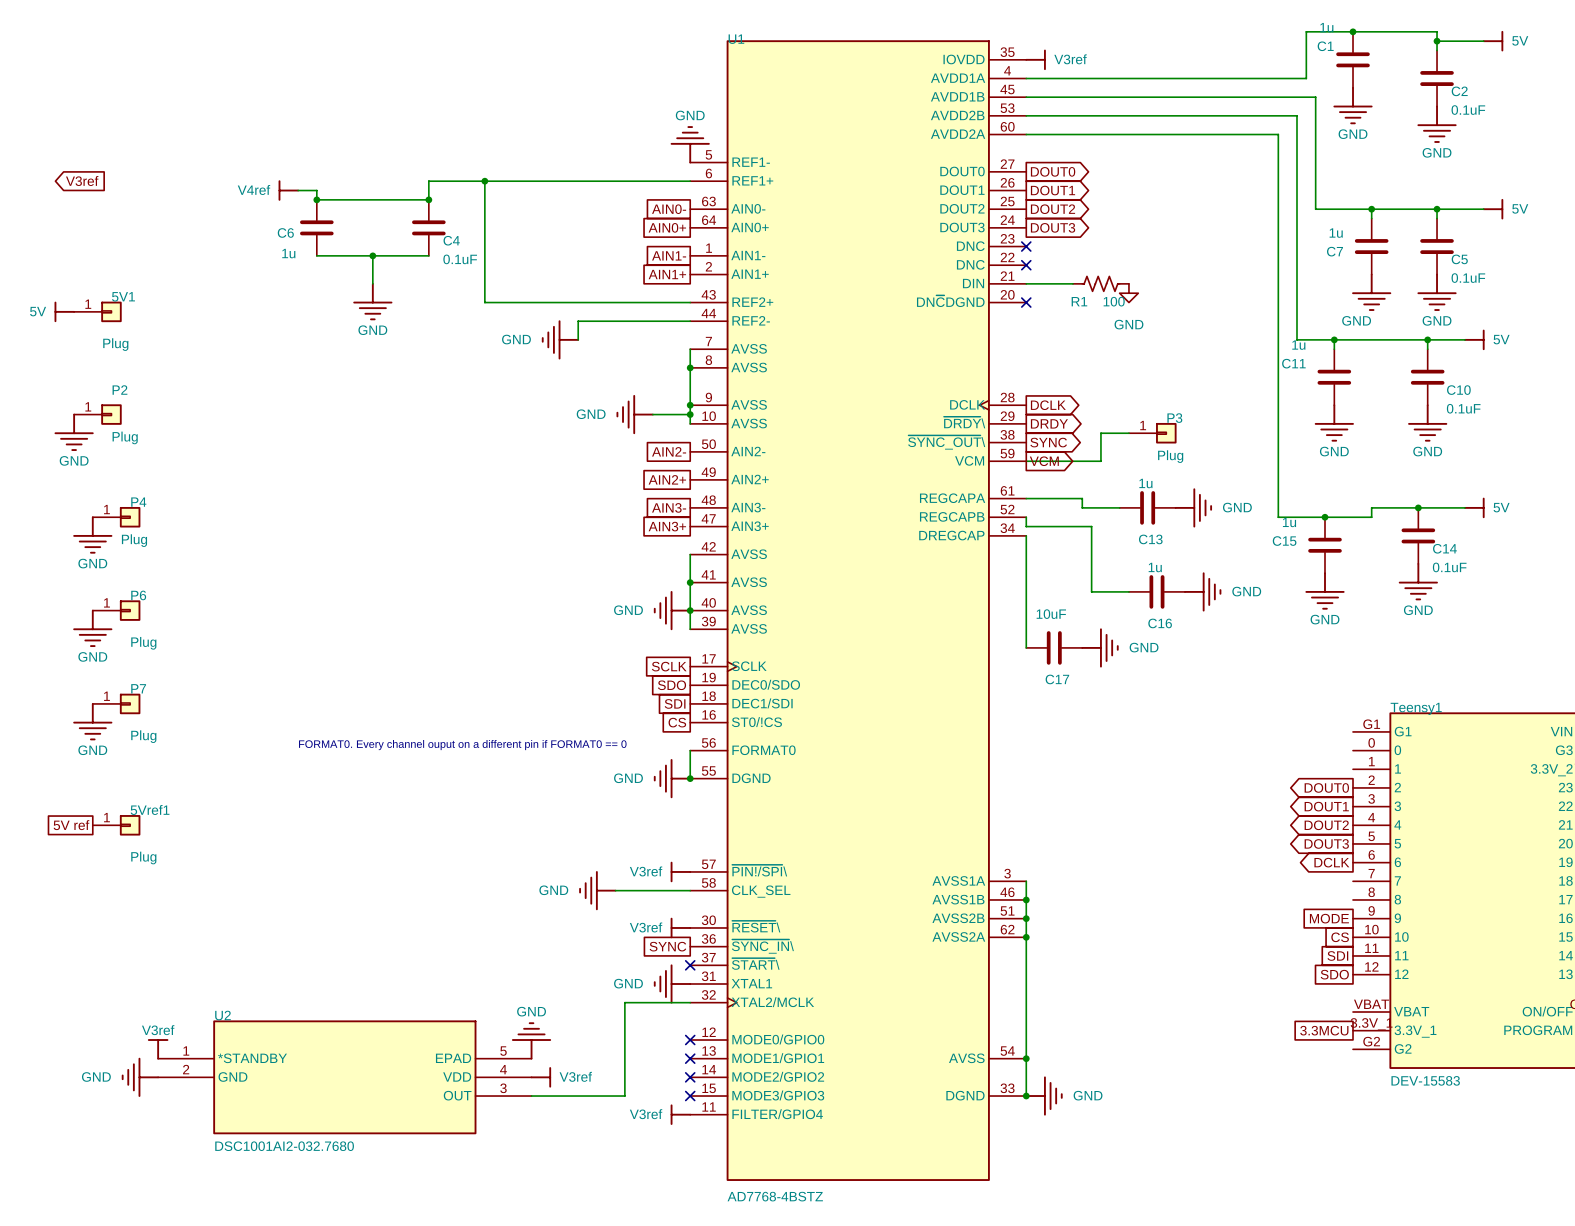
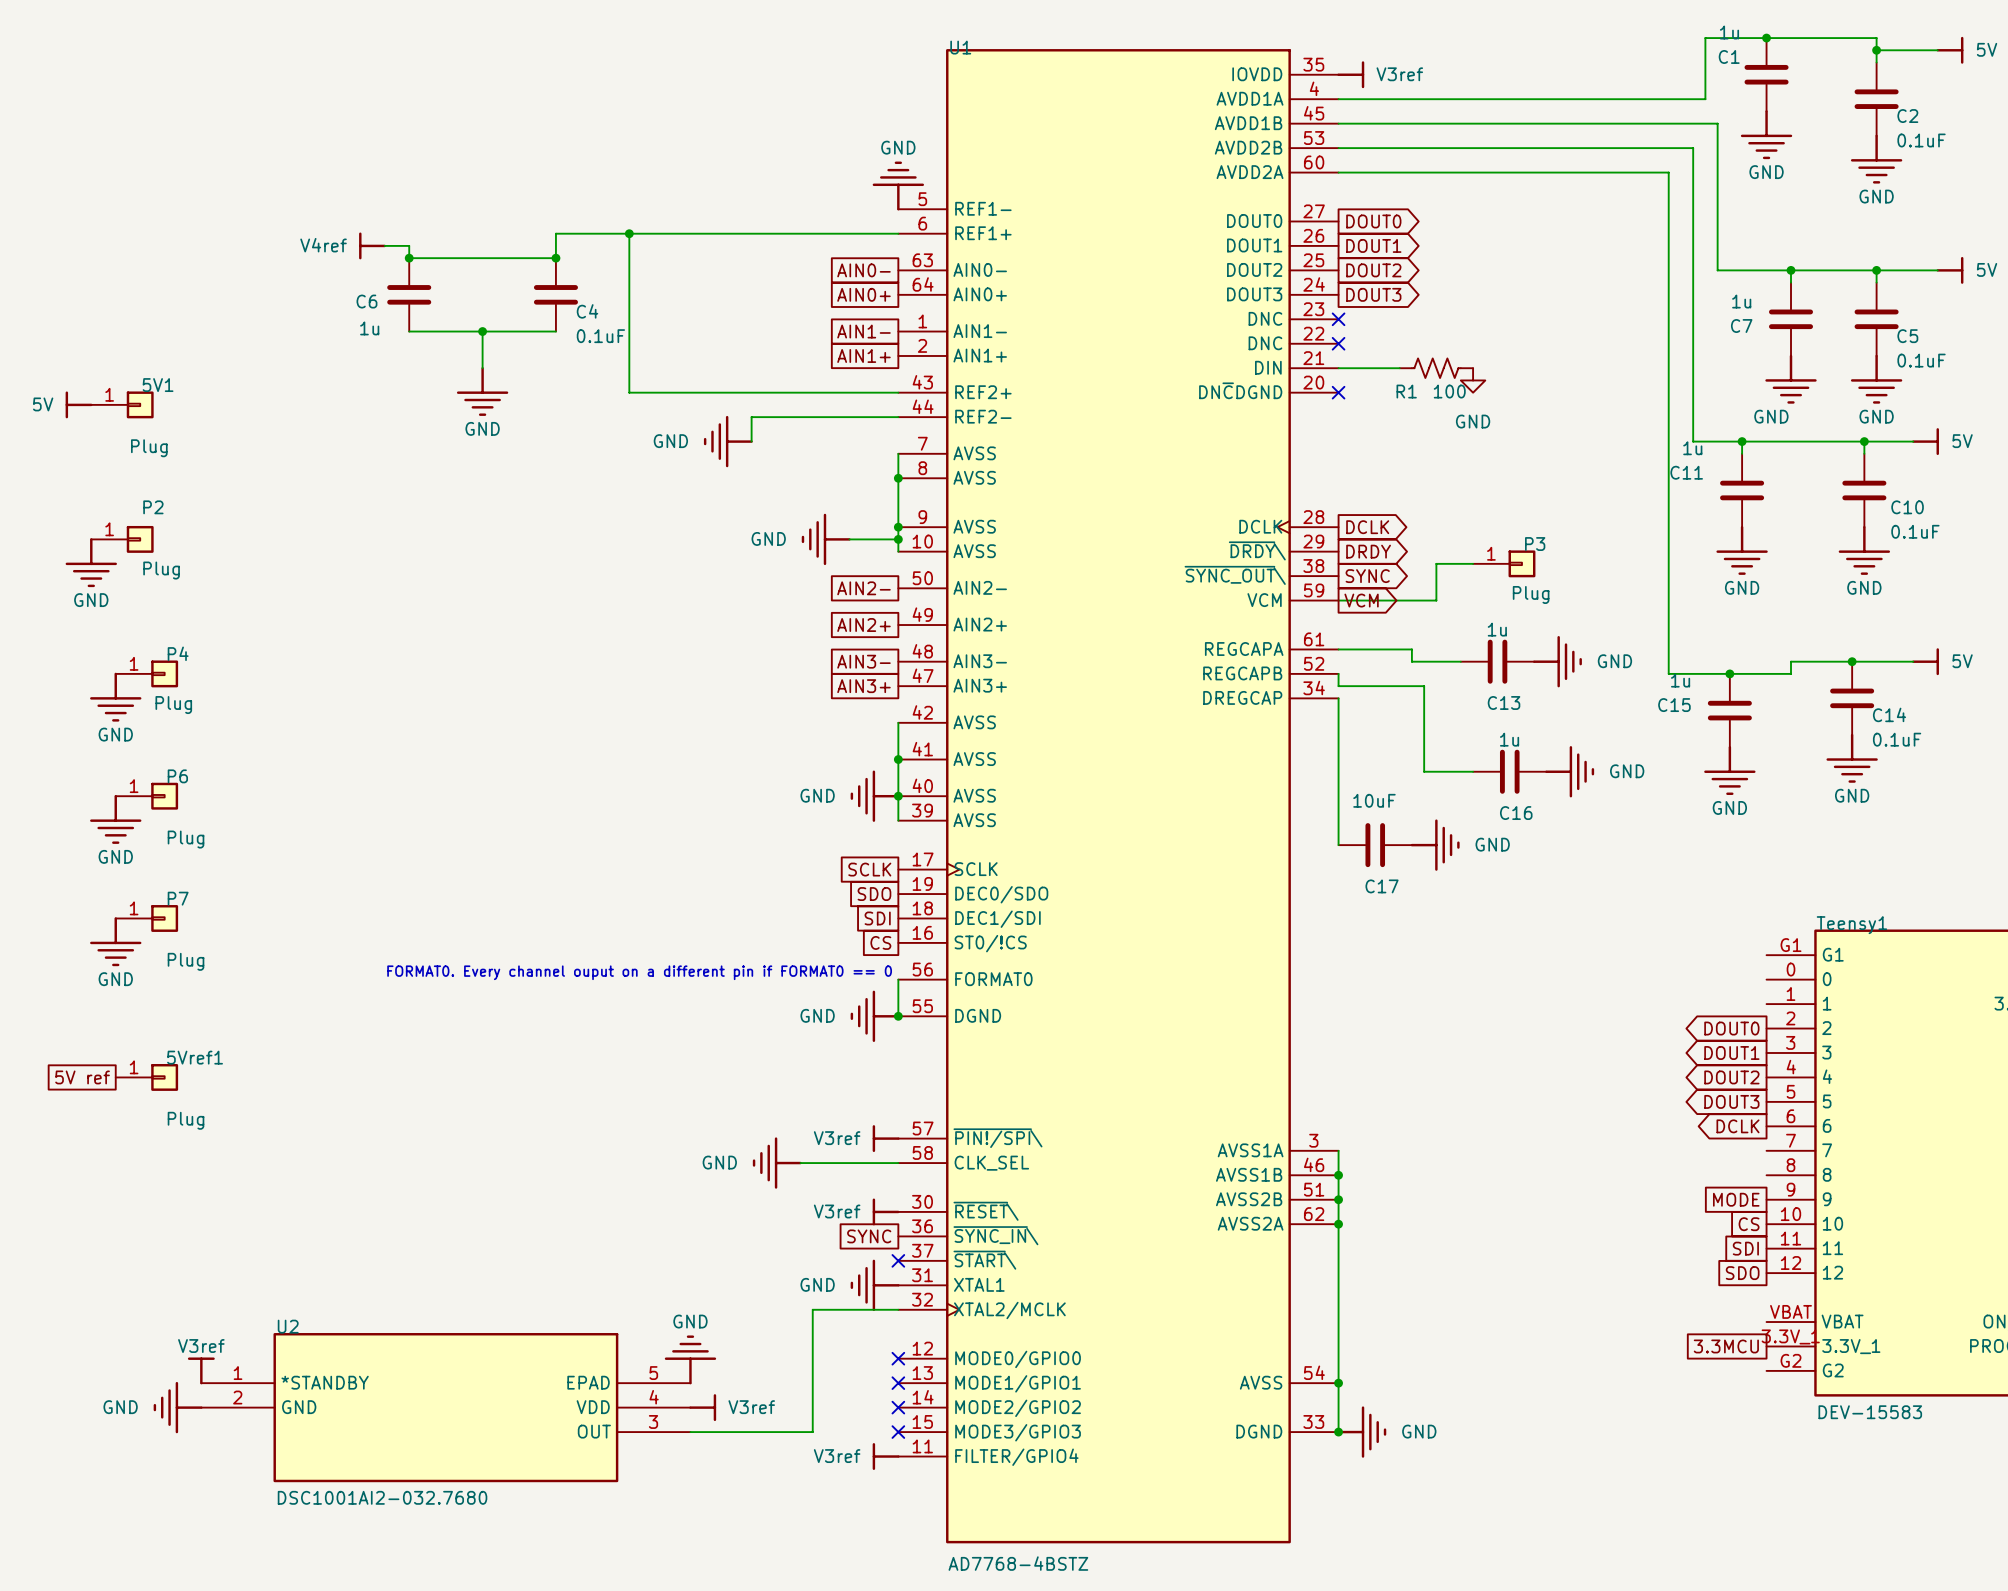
global label: V3ref (82, 181) -> none

